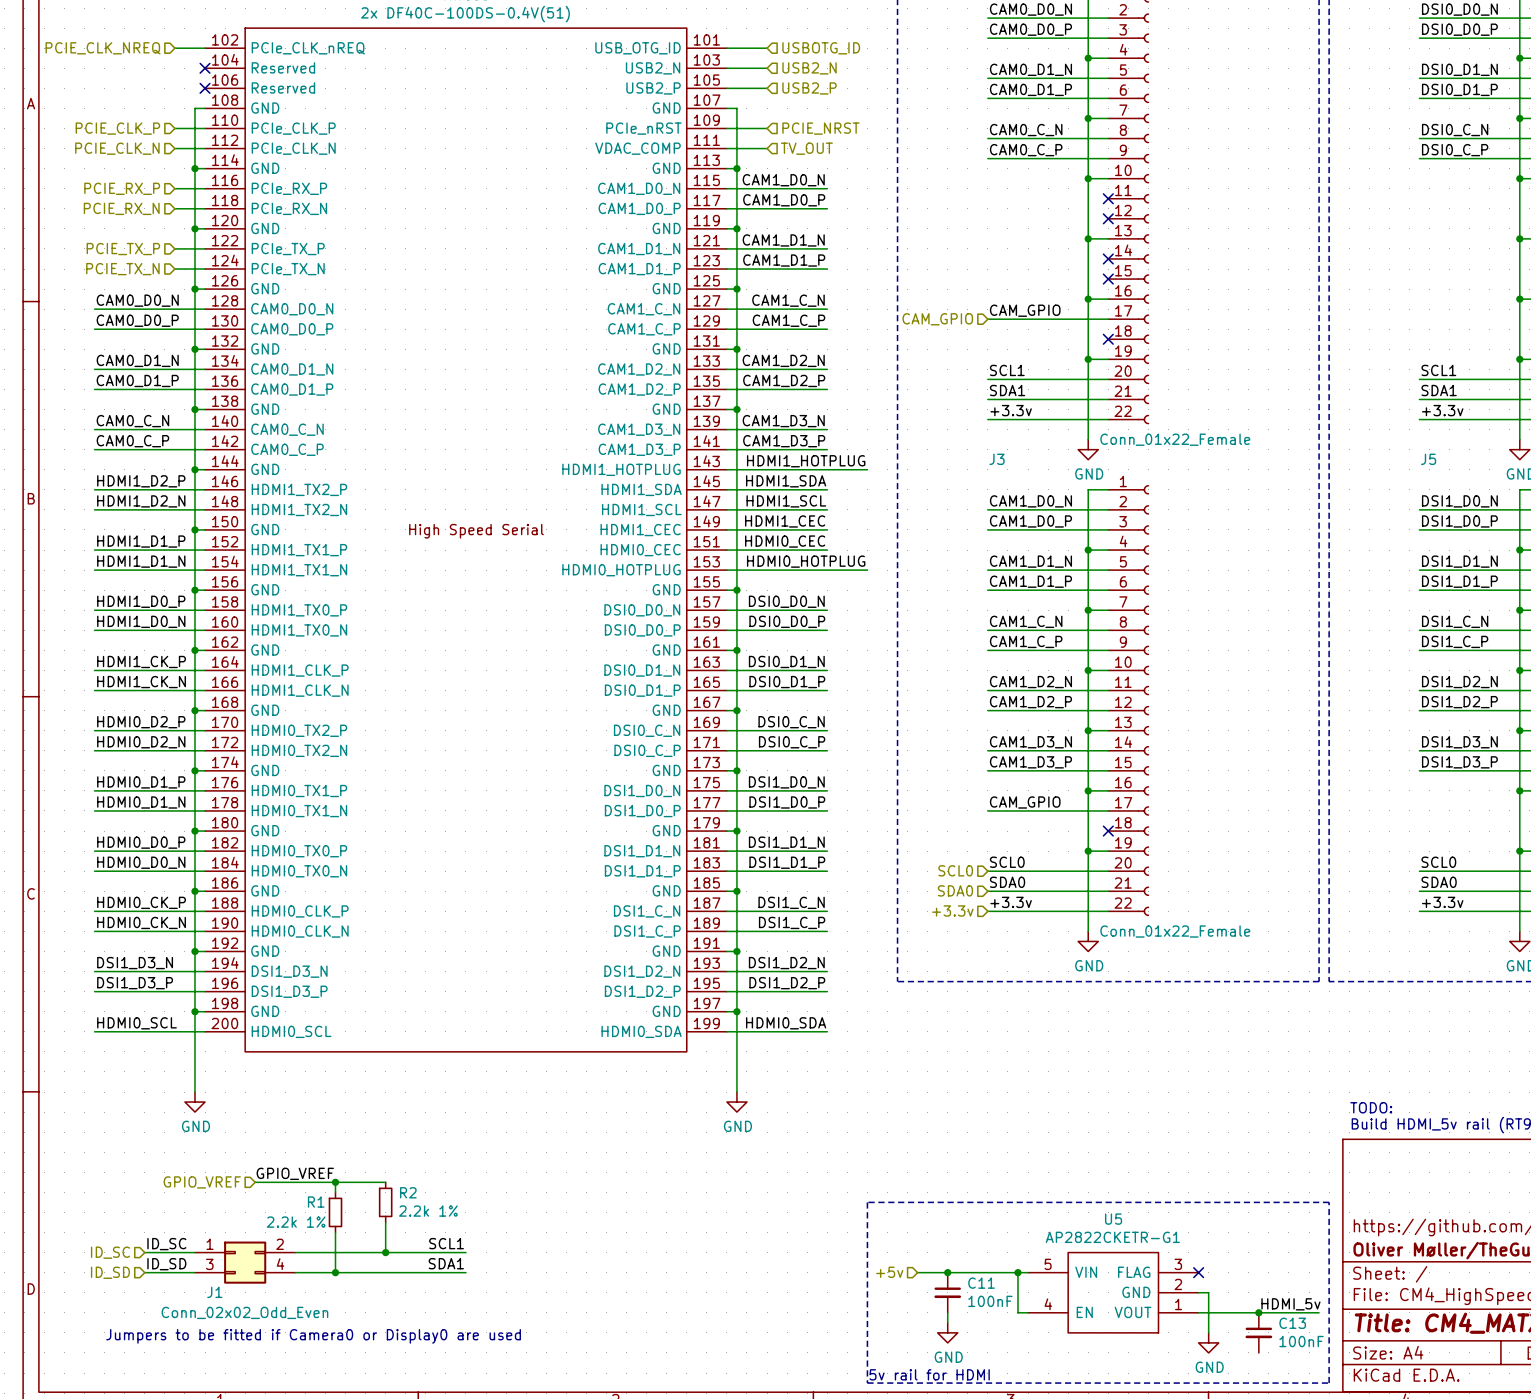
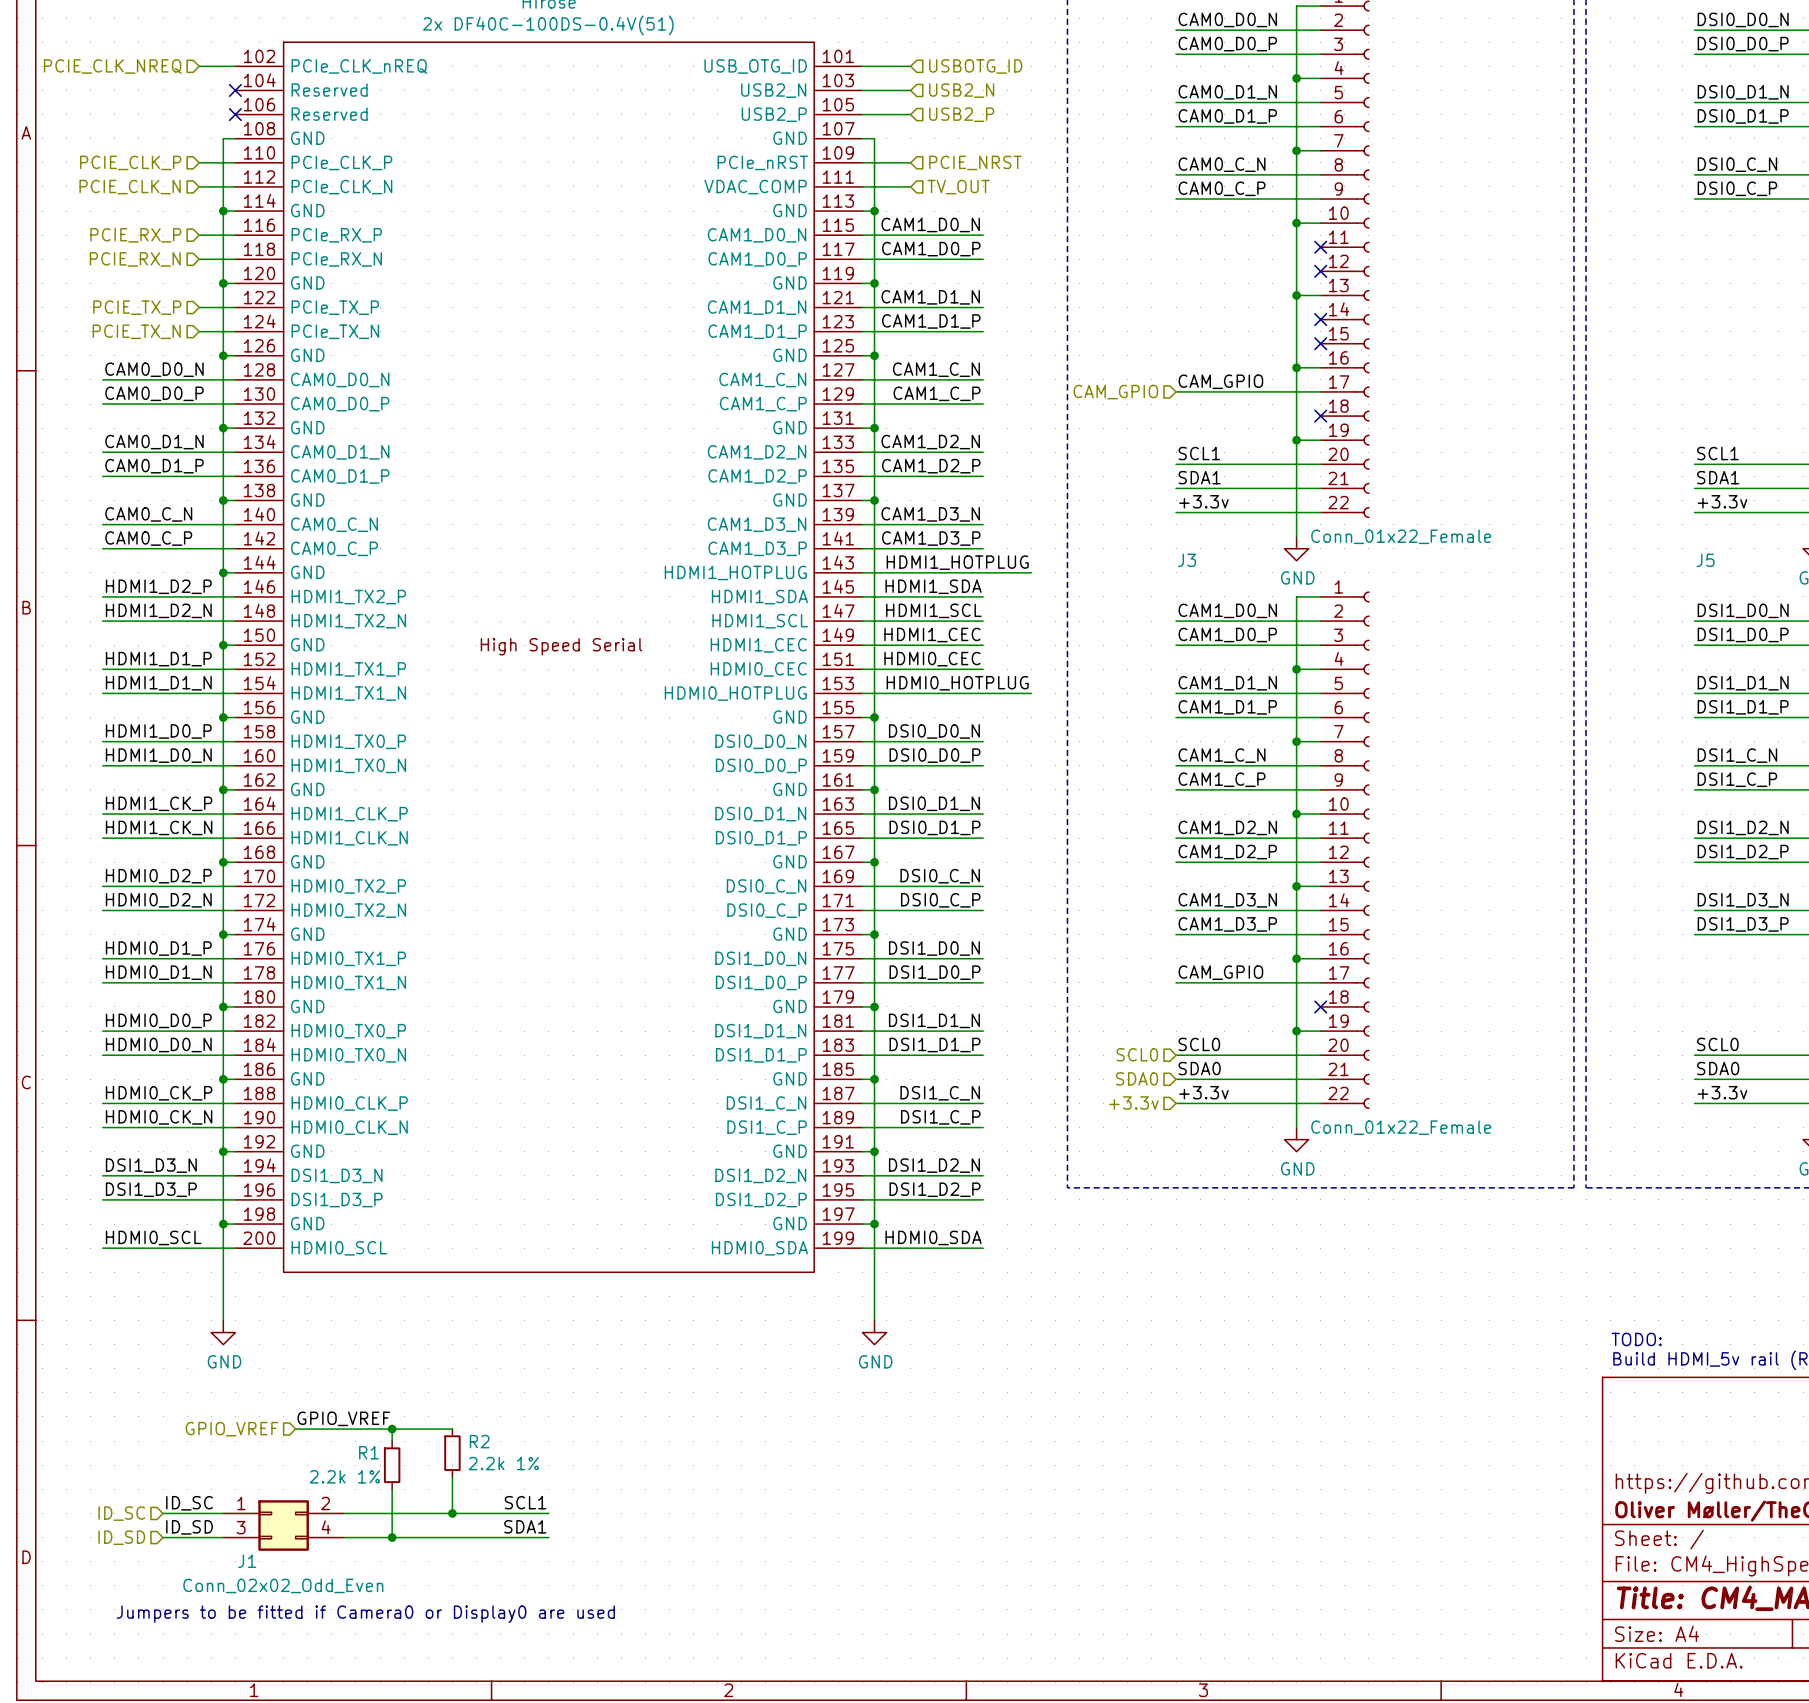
line: (867, 1202) (1329, 1202) (1329, 1383) (867, 1383) (867, 1202) -> none
hierarchical label: +5v (889, 1272) -> none
wire: (917, 1272) (1028, 1272) -> none
junction: (947, 1272) -> none
wire: (1017, 1272) (1017, 1312) (1028, 1312) -> none
junction: (1017, 1272) -> none
no-connect mark: (1198, 1272) -> none
C11: 100nF (947, 1292) -> none
U5: AP2822CKETR-G1 (1113, 1292) -> none
wire: (1198, 1292) (1208, 1292) (1208, 1332) -> none
label: HDMI_5v (1290, 1304) -> none
wire: (947, 1312) (947, 1322) -> none
wire: (1198, 1312) (1319, 1312) -> none
junction: (1258, 1312) -> none
power symbol: GND (947, 1332) -> none
C13: 100nF (1258, 1332) -> none
power symbol: GND (1208, 1342) -> none
text: 5v rail for HDMI (929, 1374) -> none

